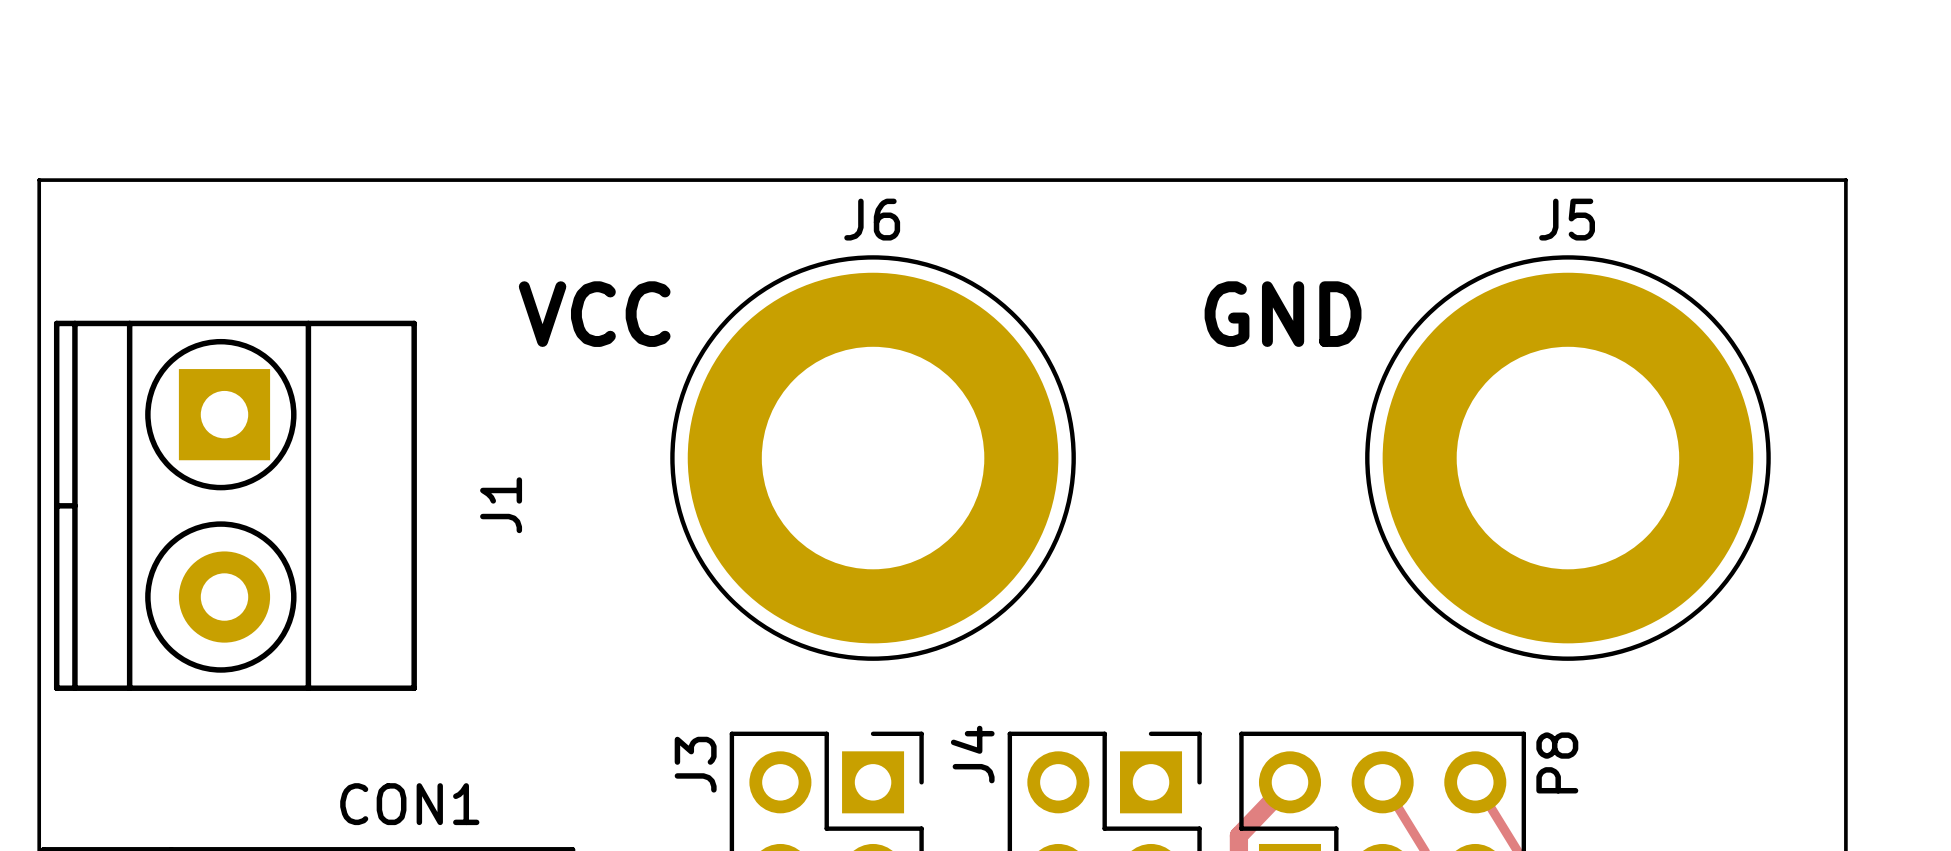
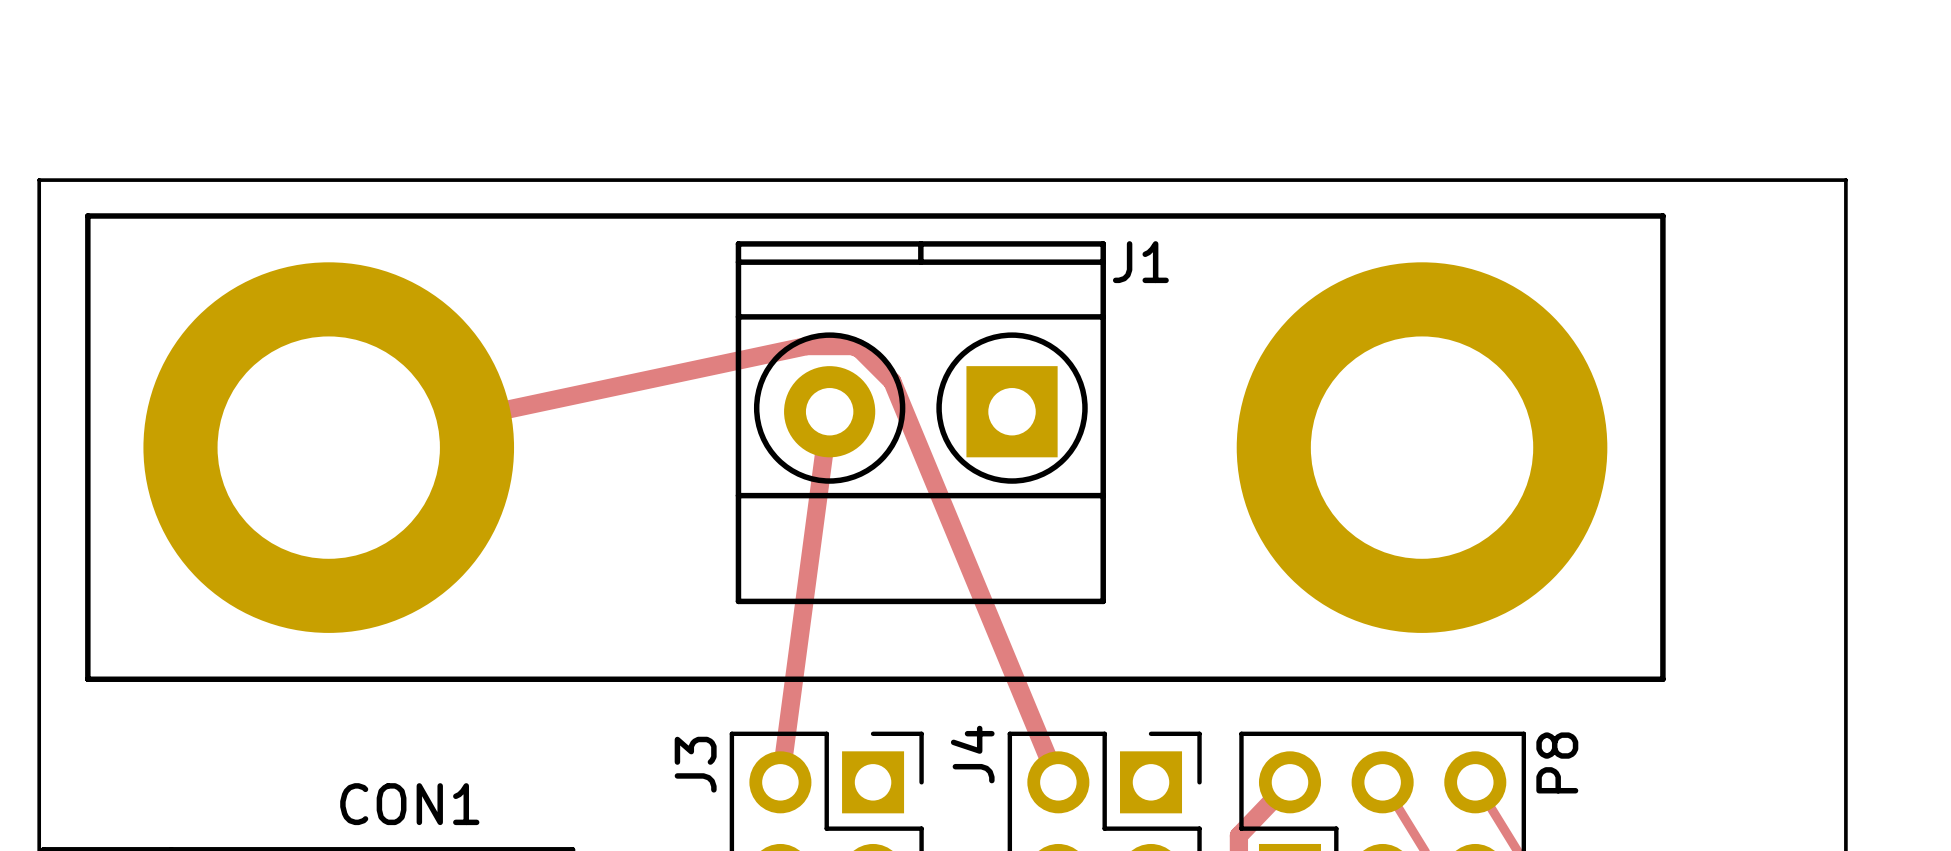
text: VCC (594, 314) -> none
text: GND (1283, 314) -> none
track: none -> (829, 411) (780, 782)
track: none -> (328, 447) (806, 346) (852, 346) (859, 349) (892, 381) (1058, 782)
part: none -> (875, 447)
J6: (873, 458) -> none
J5: (1567, 458) -> none
J1 rotation: 0° (235, 505) -> 90° clockwise (920, 422)
J1 position: (235, 505) -> (920, 422)
J1 name position: J1 (501, 505) -> J1 (1140, 262)

